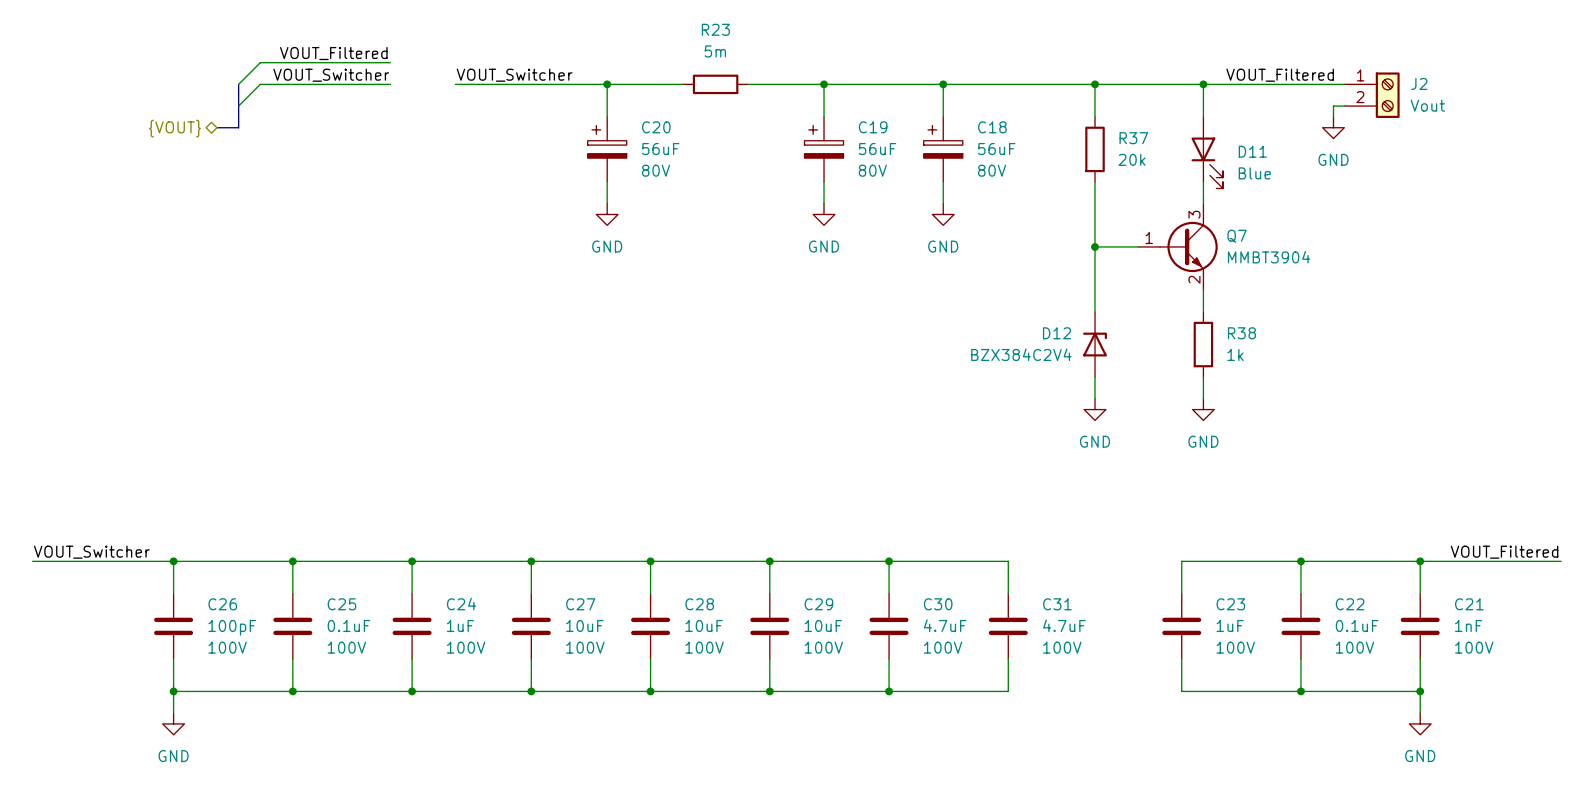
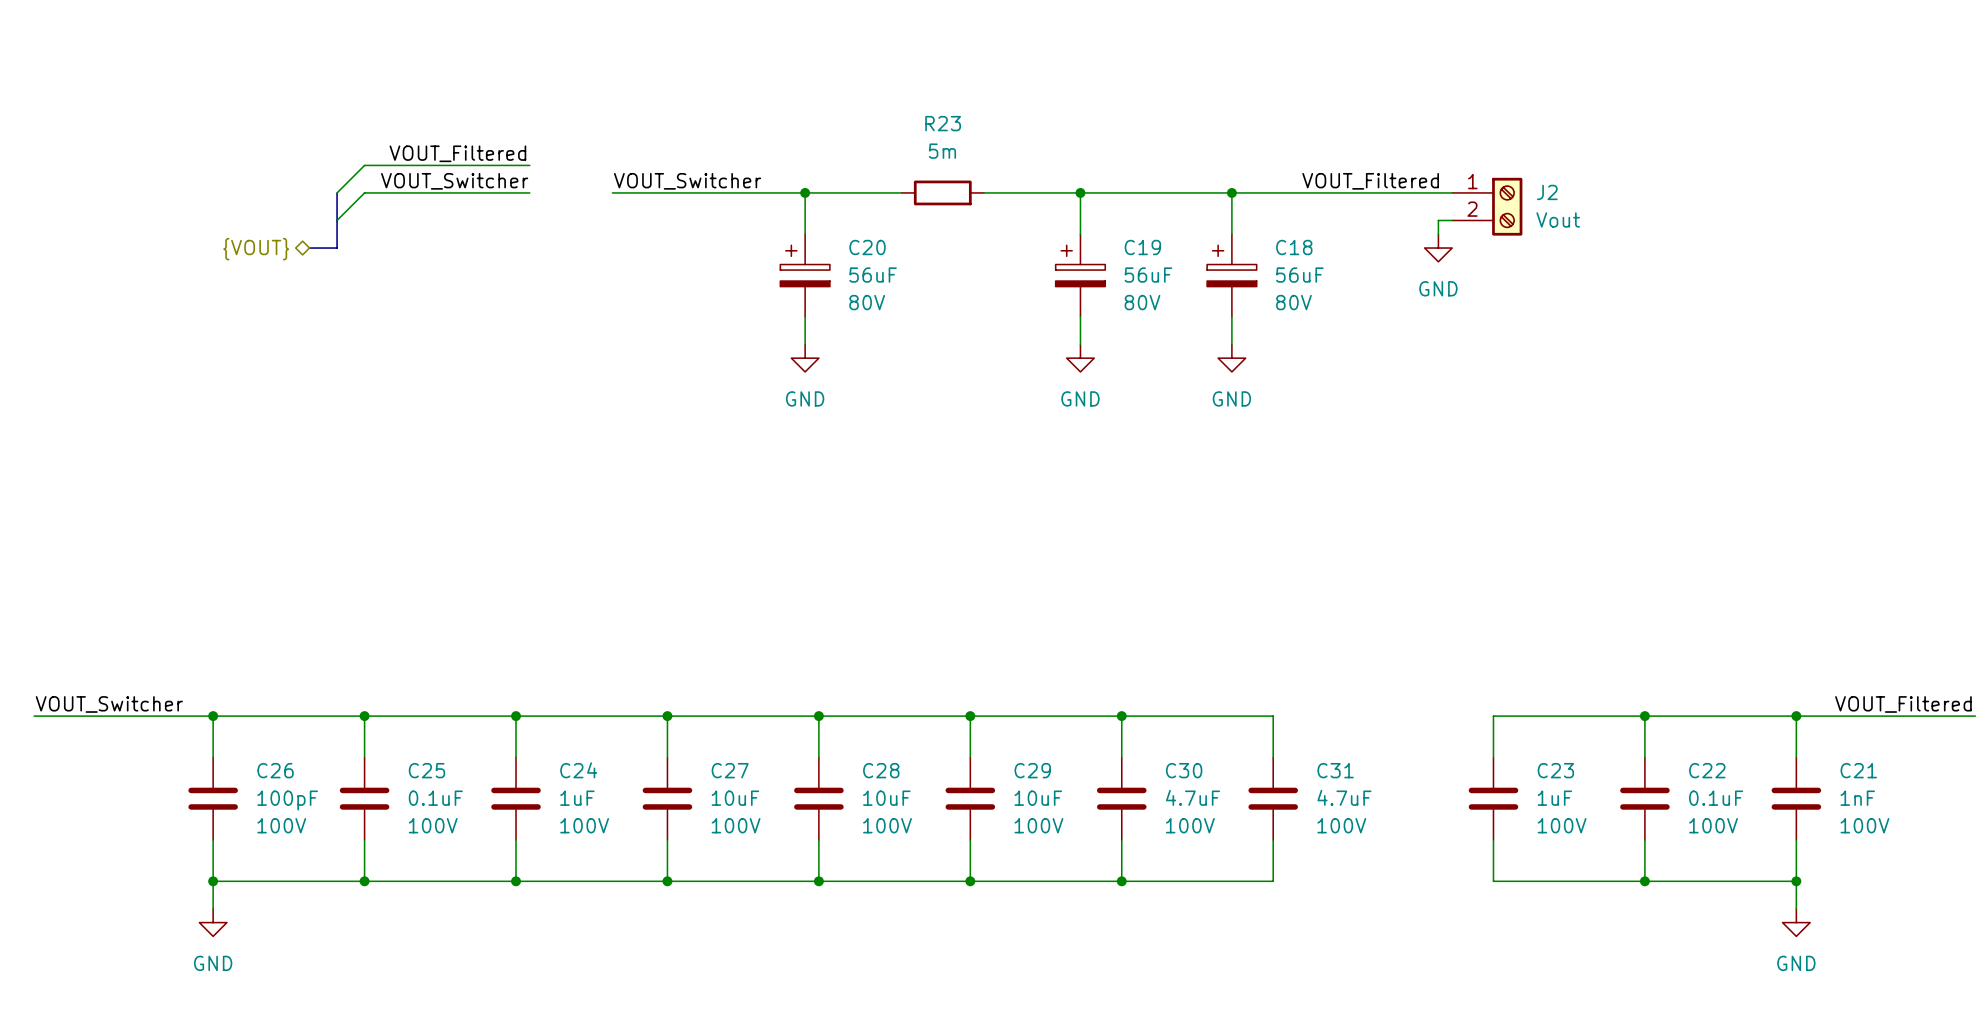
label position: VOUT_Filtered (333, 53) -> VOUT_Filtered (457, 153)
wire: (390, 62) (260, 62) (238, 84) -> (529, 165) (364, 165) (337, 192)
label: VOUT_Switcher (331, 75) -> none
label: VOUT_Switcher (514, 75) -> none
label position: VOUT_Filtered (1280, 75) -> VOUT_Filtered (1370, 181)
bus: (238, 84) (238, 127) (216, 127) -> (337, 192) (337, 248) (309, 248)
wire: (390, 84) (260, 84) (238, 106) -> (529, 192) (364, 192) (337, 220)
wire: (455, 84) (683, 84) -> (612, 192) (901, 192)
wire: (607, 84) (607, 116) -> (805, 192) (805, 234)
junction: (607, 84) -> none
R23 position: (715, 84) -> (942, 192)
wire: (748, 84) (1344, 84) -> none
wire: (824, 84) (824, 116) -> (1080, 192) (1080, 234)
junction: (824, 84) -> none
wire: (943, 84) (943, 116) -> (1231, 192) (1231, 234)
junction: (943, 84) -> none
wire: (1095, 84) (1095, 116) -> none
junction: (1095, 84) -> none
wire: (1203, 84) (1203, 116) -> none
junction: (1203, 84) -> none
J2 position: (1371, 95) -> (1487, 206)
wire: (1344, 106) (1333, 106) (1333, 116) -> (1452, 220) (1438, 220) (1438, 234)
power symbol: GND (1333, 127) -> none
hierarchical label position: {VOUT} (174, 128) -> {VOUT} (256, 249)
label: none -> VOUT_Switcher (454, 181)
label: none -> VOUT_Switcher (687, 181)
C20 position: (607, 149) -> (805, 275)
junction: none -> (805, 192)
wire: none -> (984, 192) (1452, 192)
C19 position: (824, 149) -> (1080, 275)
junction: none -> (1080, 192)
C18 position: (943, 149) -> (1231, 275)
junction: none -> (1231, 192)
R37: 20k (1095, 149) -> none
D11: Blue (1207, 152) -> none
wire: (607, 181) (607, 203) -> (805, 316) (805, 344)
wire: (824, 181) (824, 203) -> (1080, 316) (1080, 344)
wire: (943, 181) (943, 203) -> (1231, 316) (1231, 344)
wire: (1095, 181) (1095, 312) -> none
wire: (1203, 181) (1203, 203) -> none
power symbol: none -> GND (1438, 248)
power symbol position: GND (607, 214) -> GND (805, 358)
power symbol: GND (824, 214) -> none
power symbol: GND (943, 214) -> none
wire: (1095, 246) (1138, 246) -> none
junction: (1095, 246) -> none
Q7: MMBT3904 (1178, 246) -> none
power symbol: none -> GND (1080, 358)
power symbol: none -> GND (1231, 358)
wire: (1203, 290) (1203, 312) -> none
D12: BZX384C2V4 (1095, 344) -> none
R38: 1k (1203, 344) -> none
wire: (1095, 377) (1095, 398) -> none
wire: (1203, 377) (1203, 398) -> none
power symbol: GND (1095, 409) -> none
power symbol: GND (1203, 409) -> none

